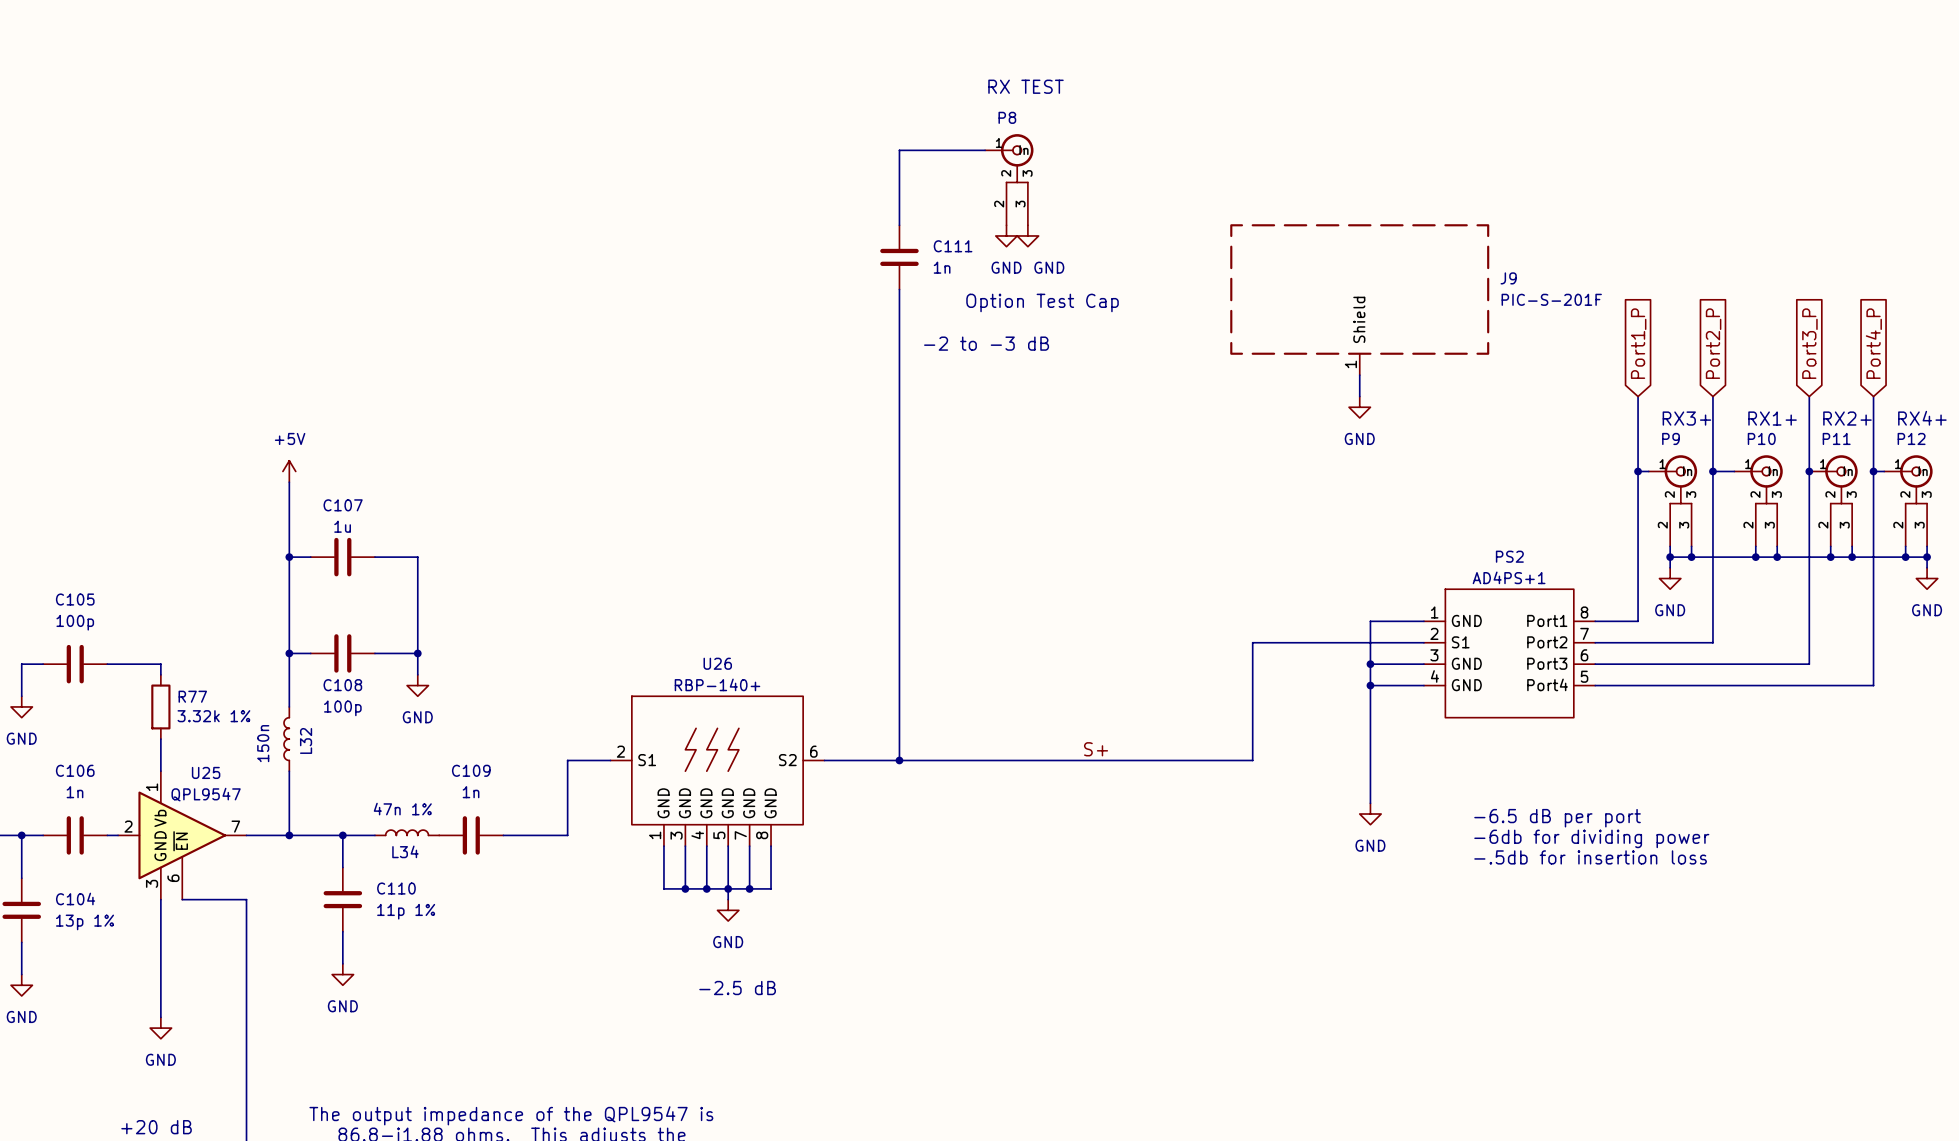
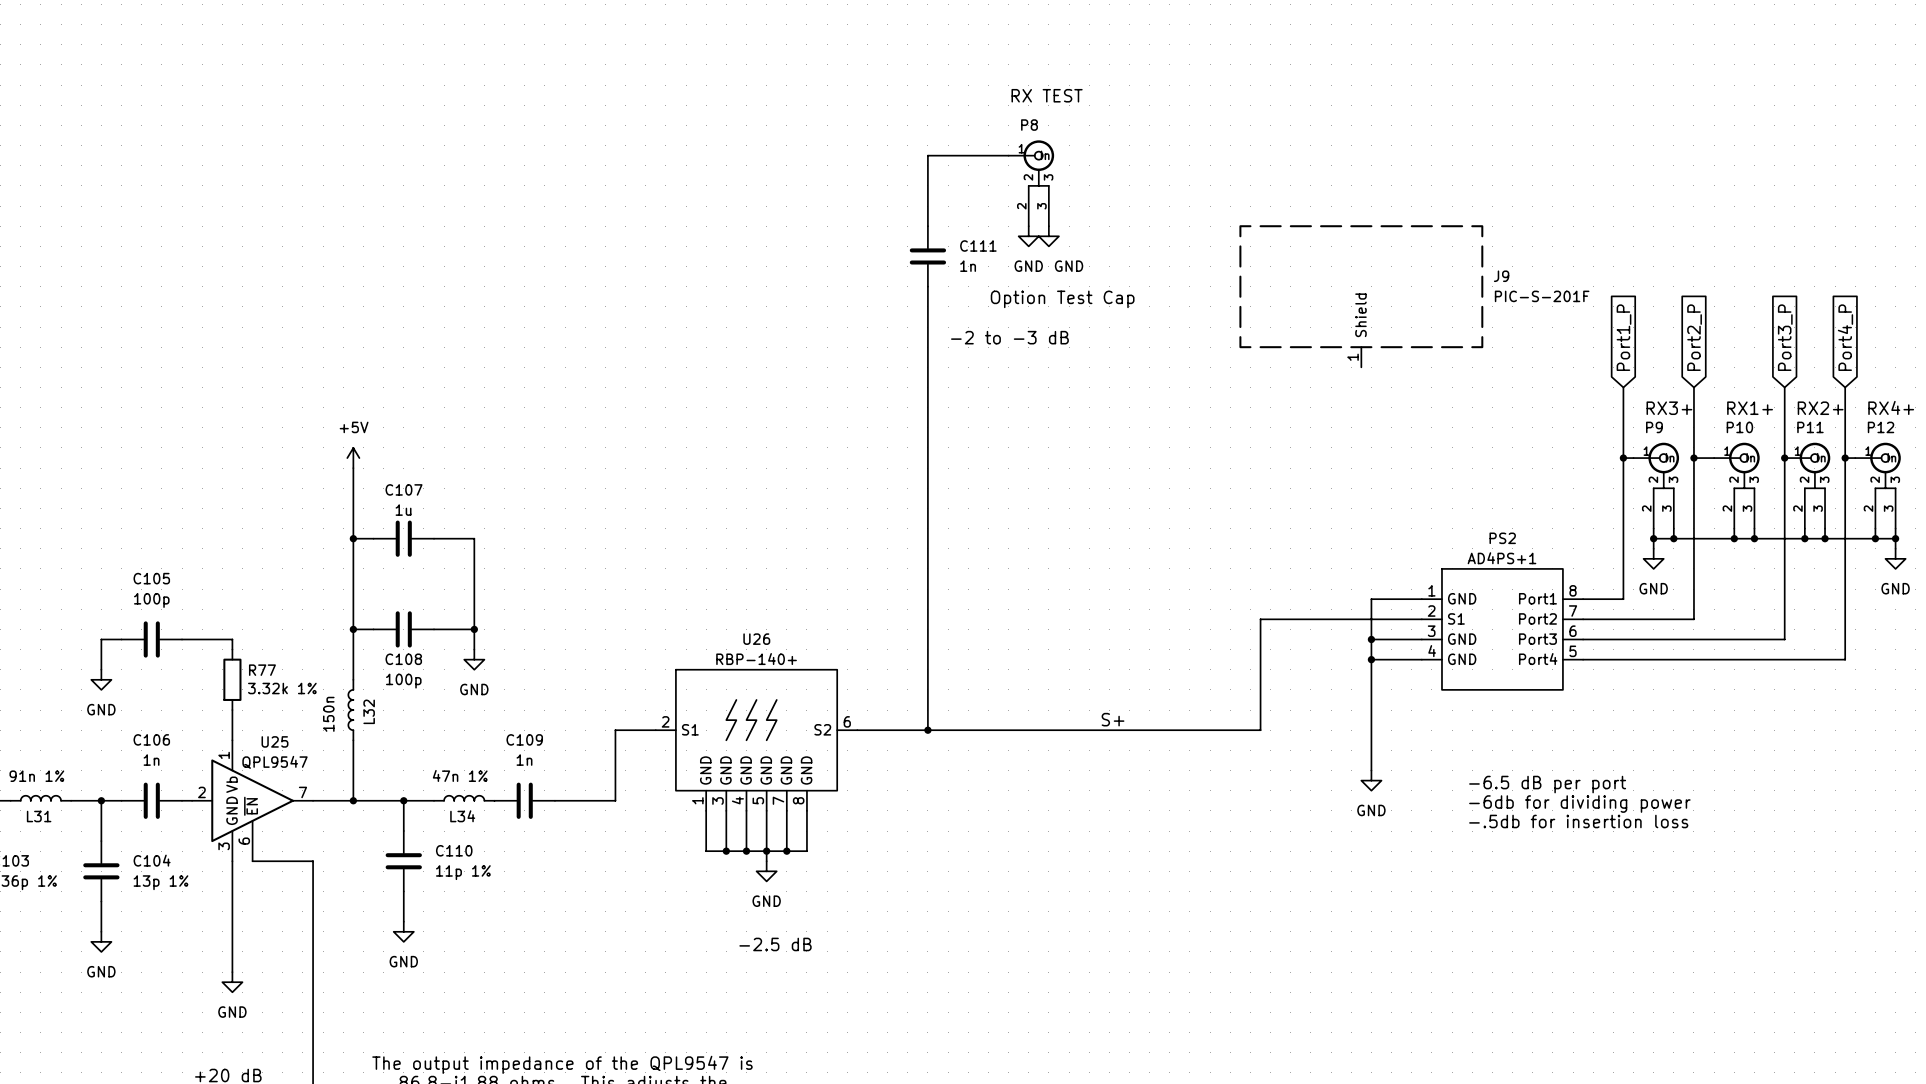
wire: (1359, 375) (1359, 396) -> none
power symbol: GND (1359, 407) -> none

